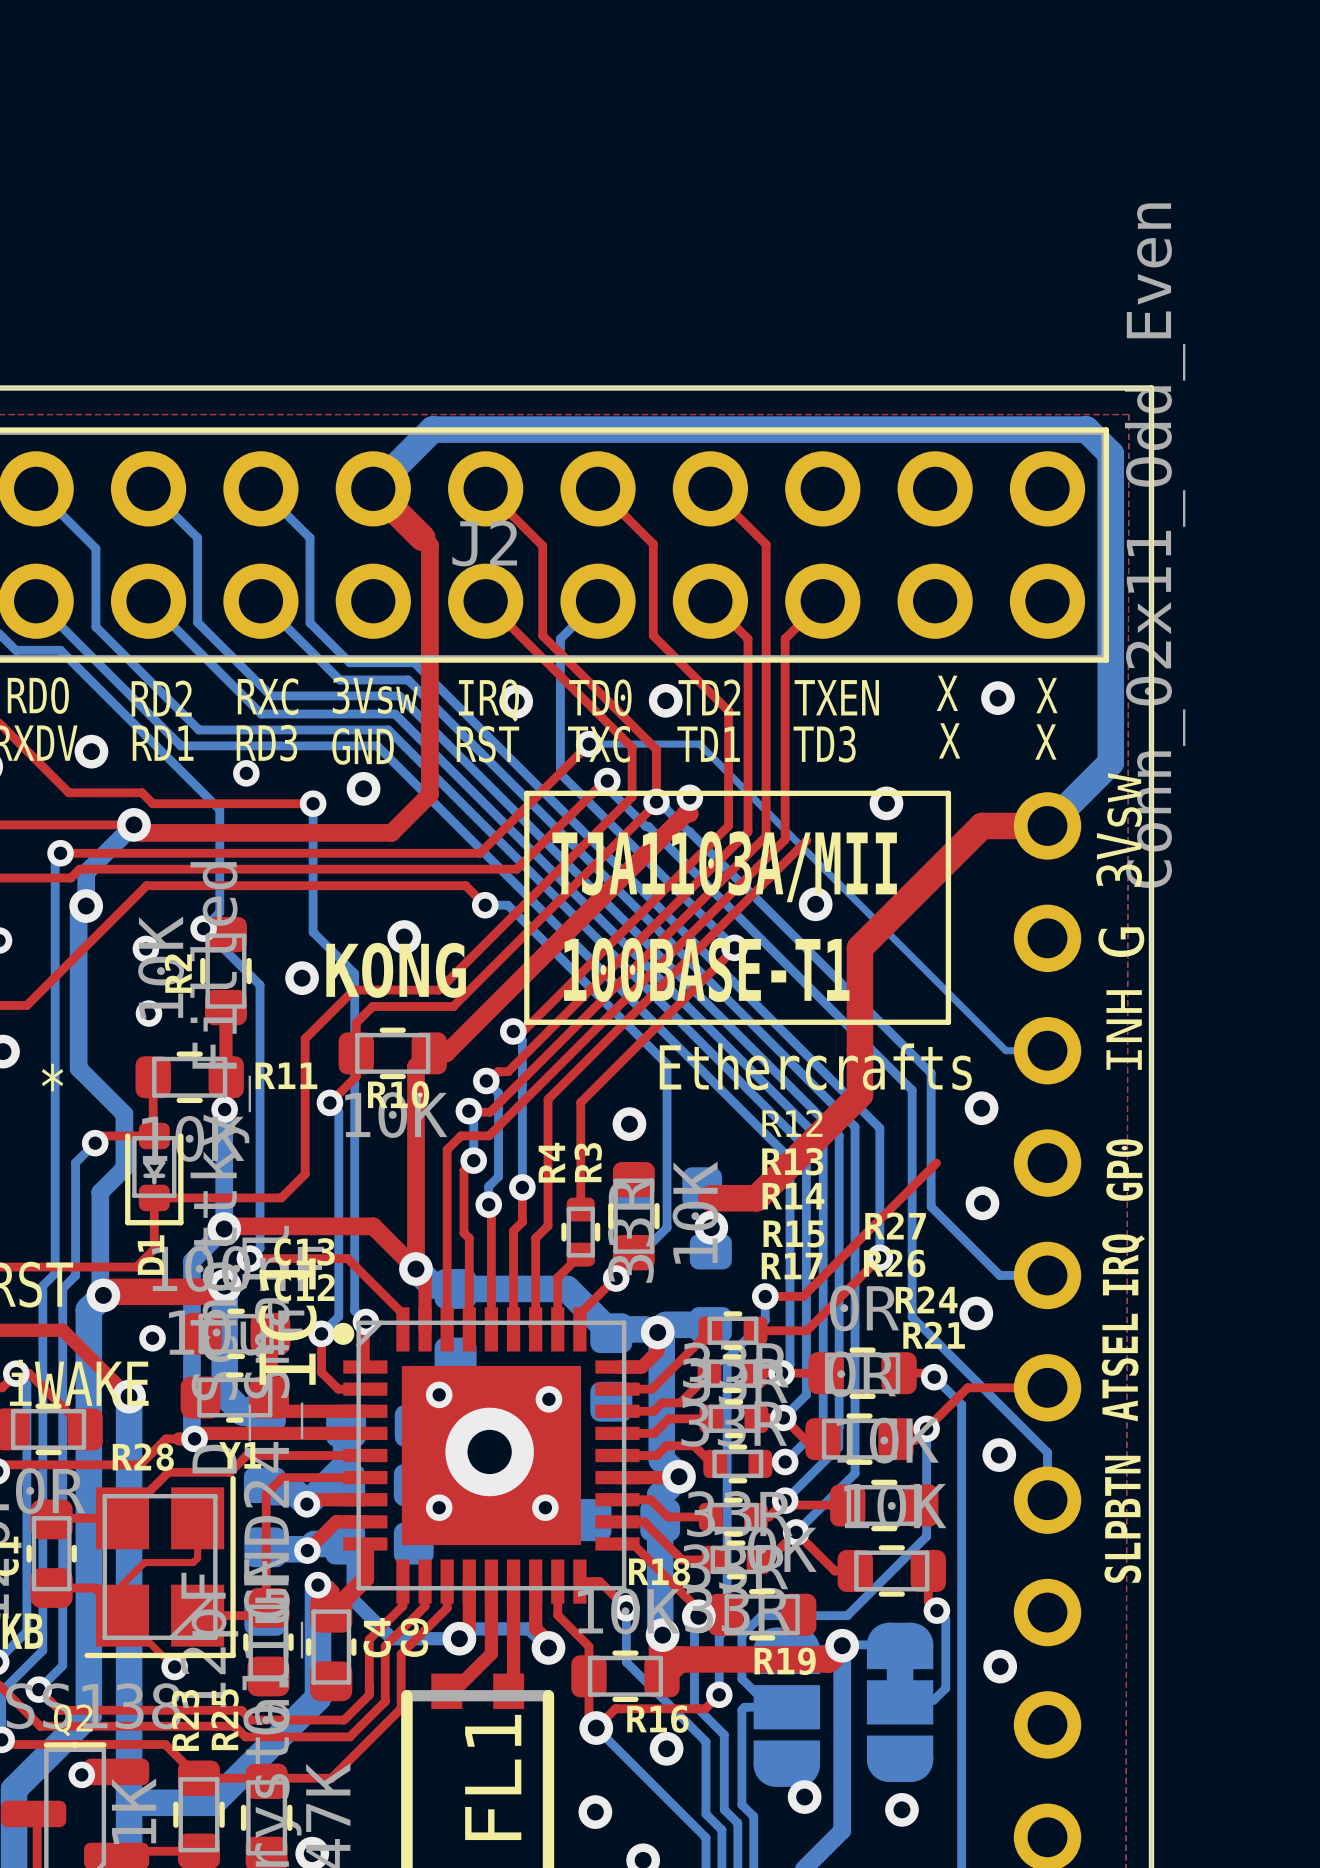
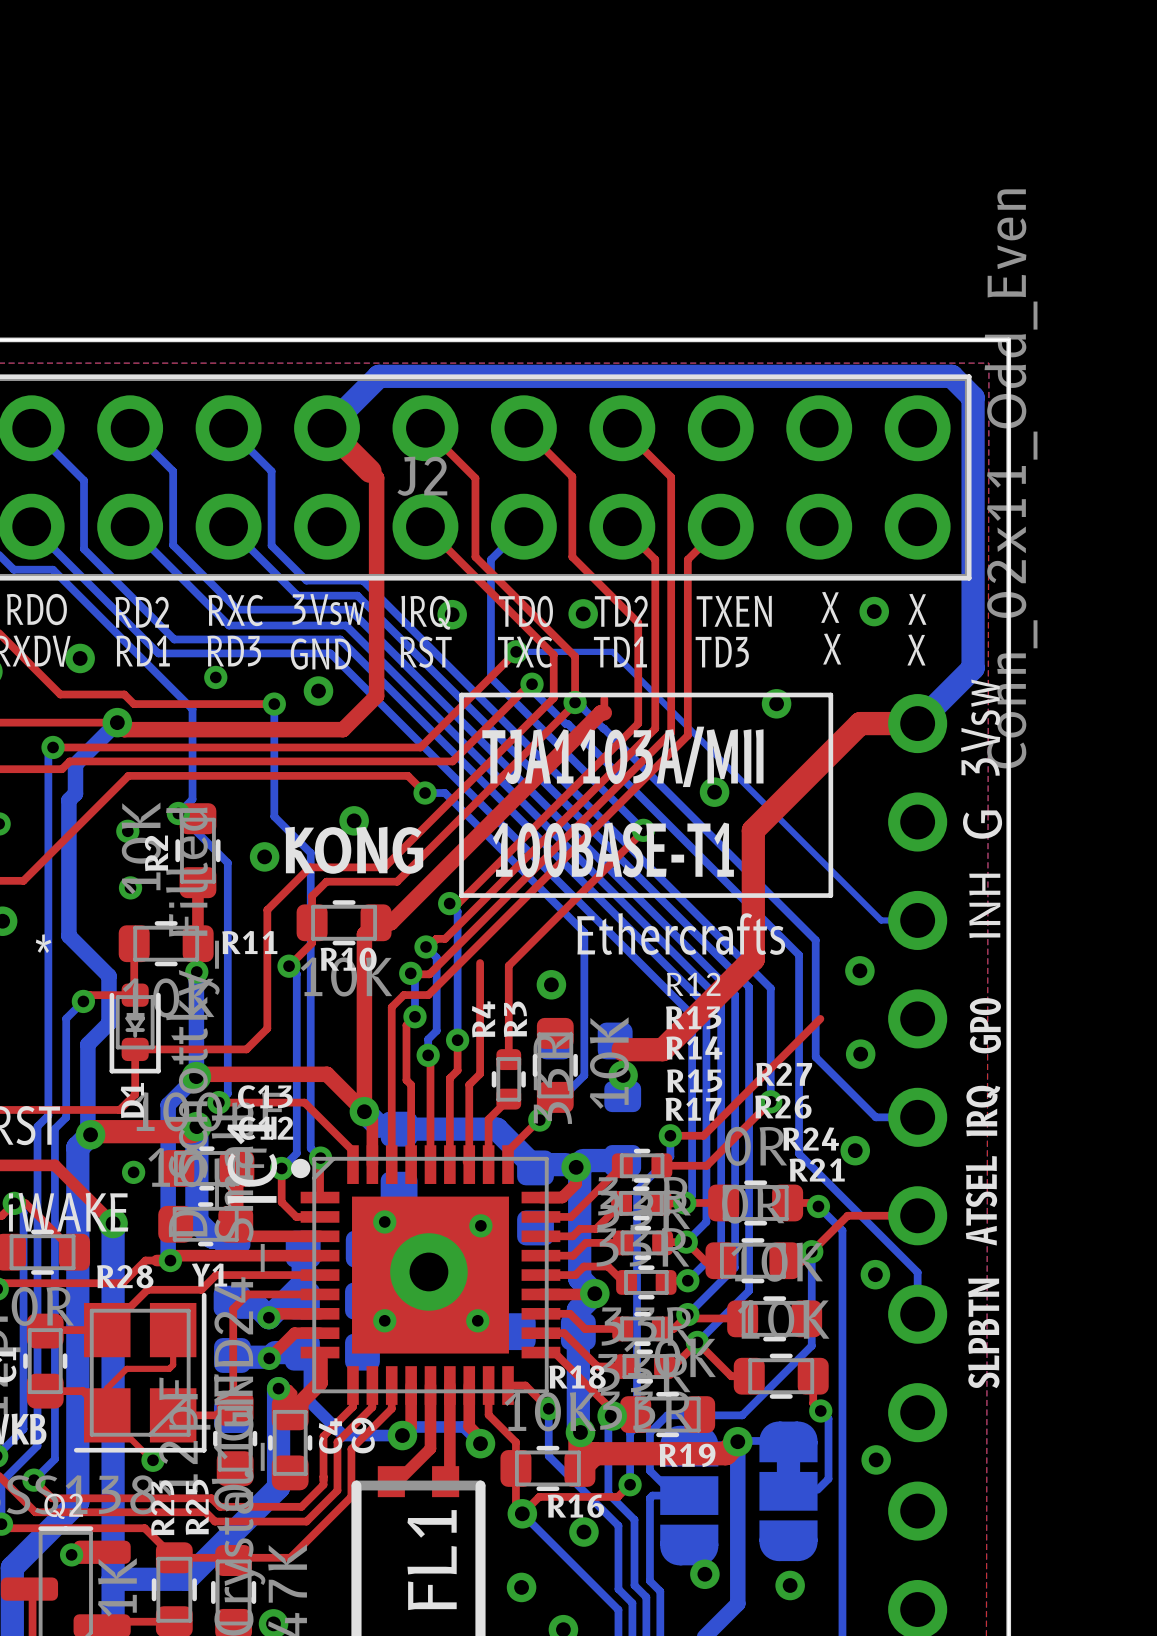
via: (689, 797) -> none
top track: (806, 840) (548, 1099) -> none
via: (86, 906) -> none

